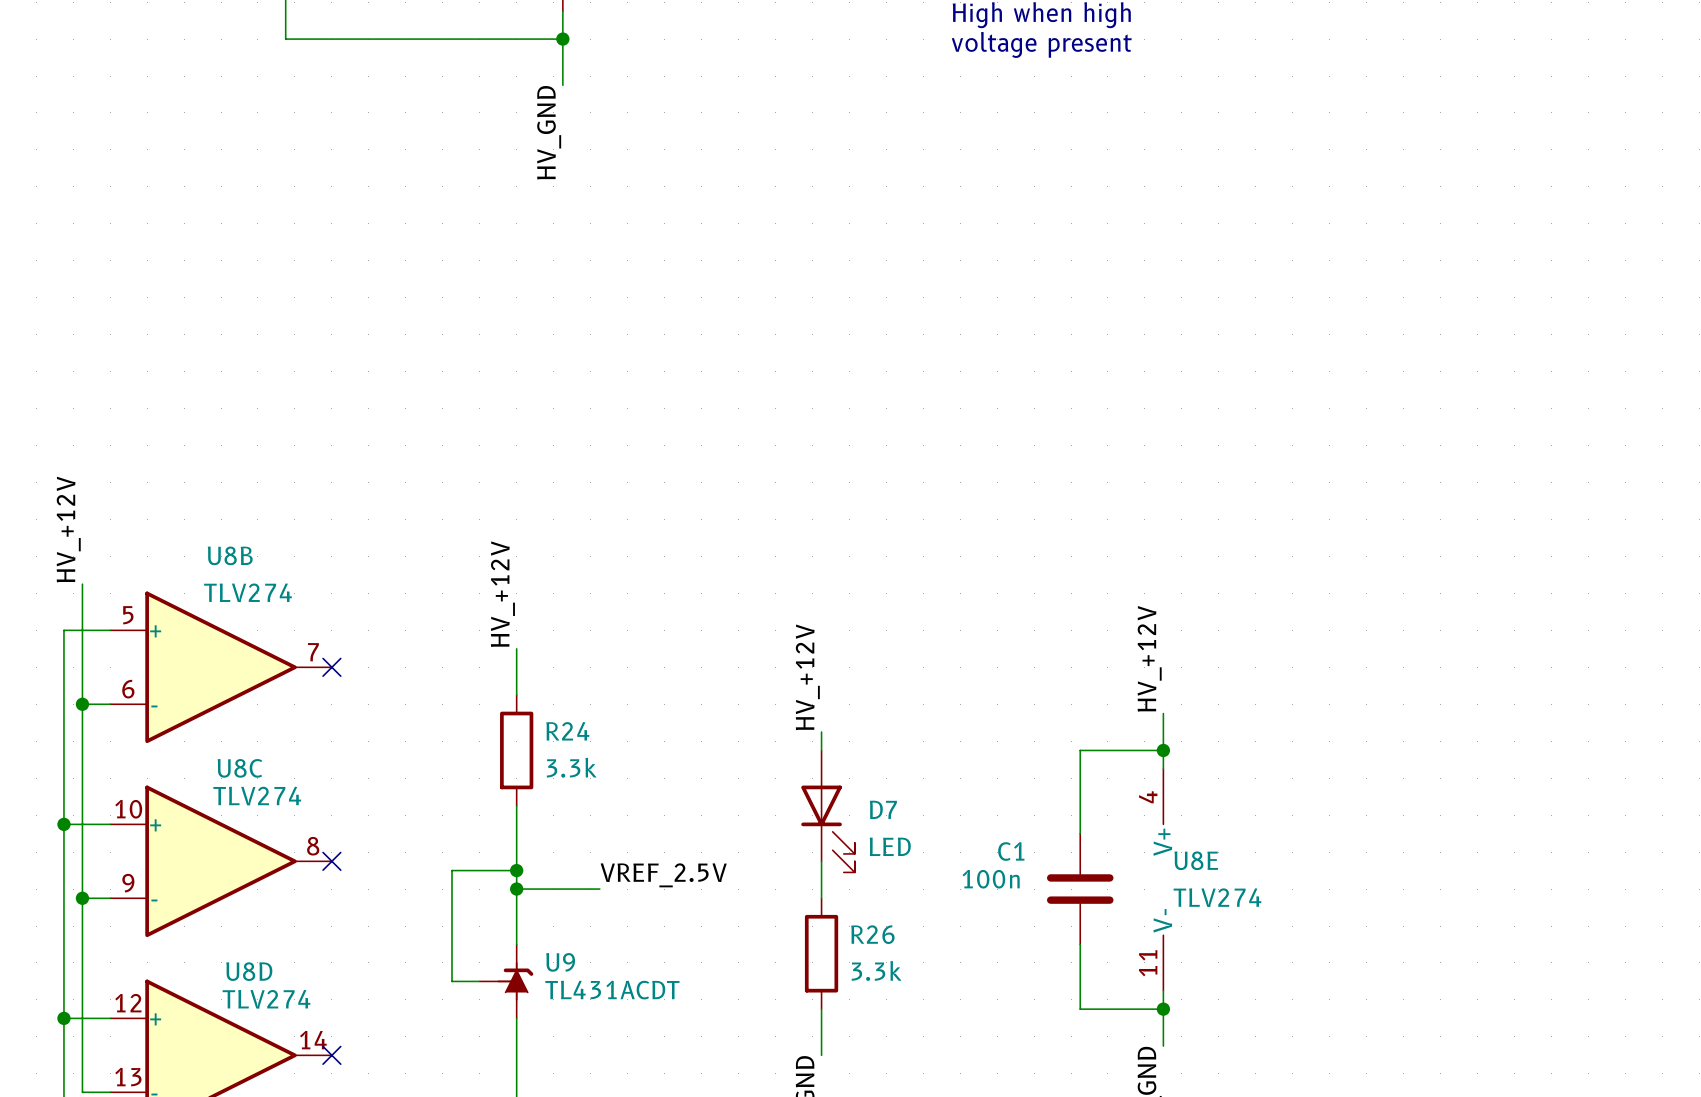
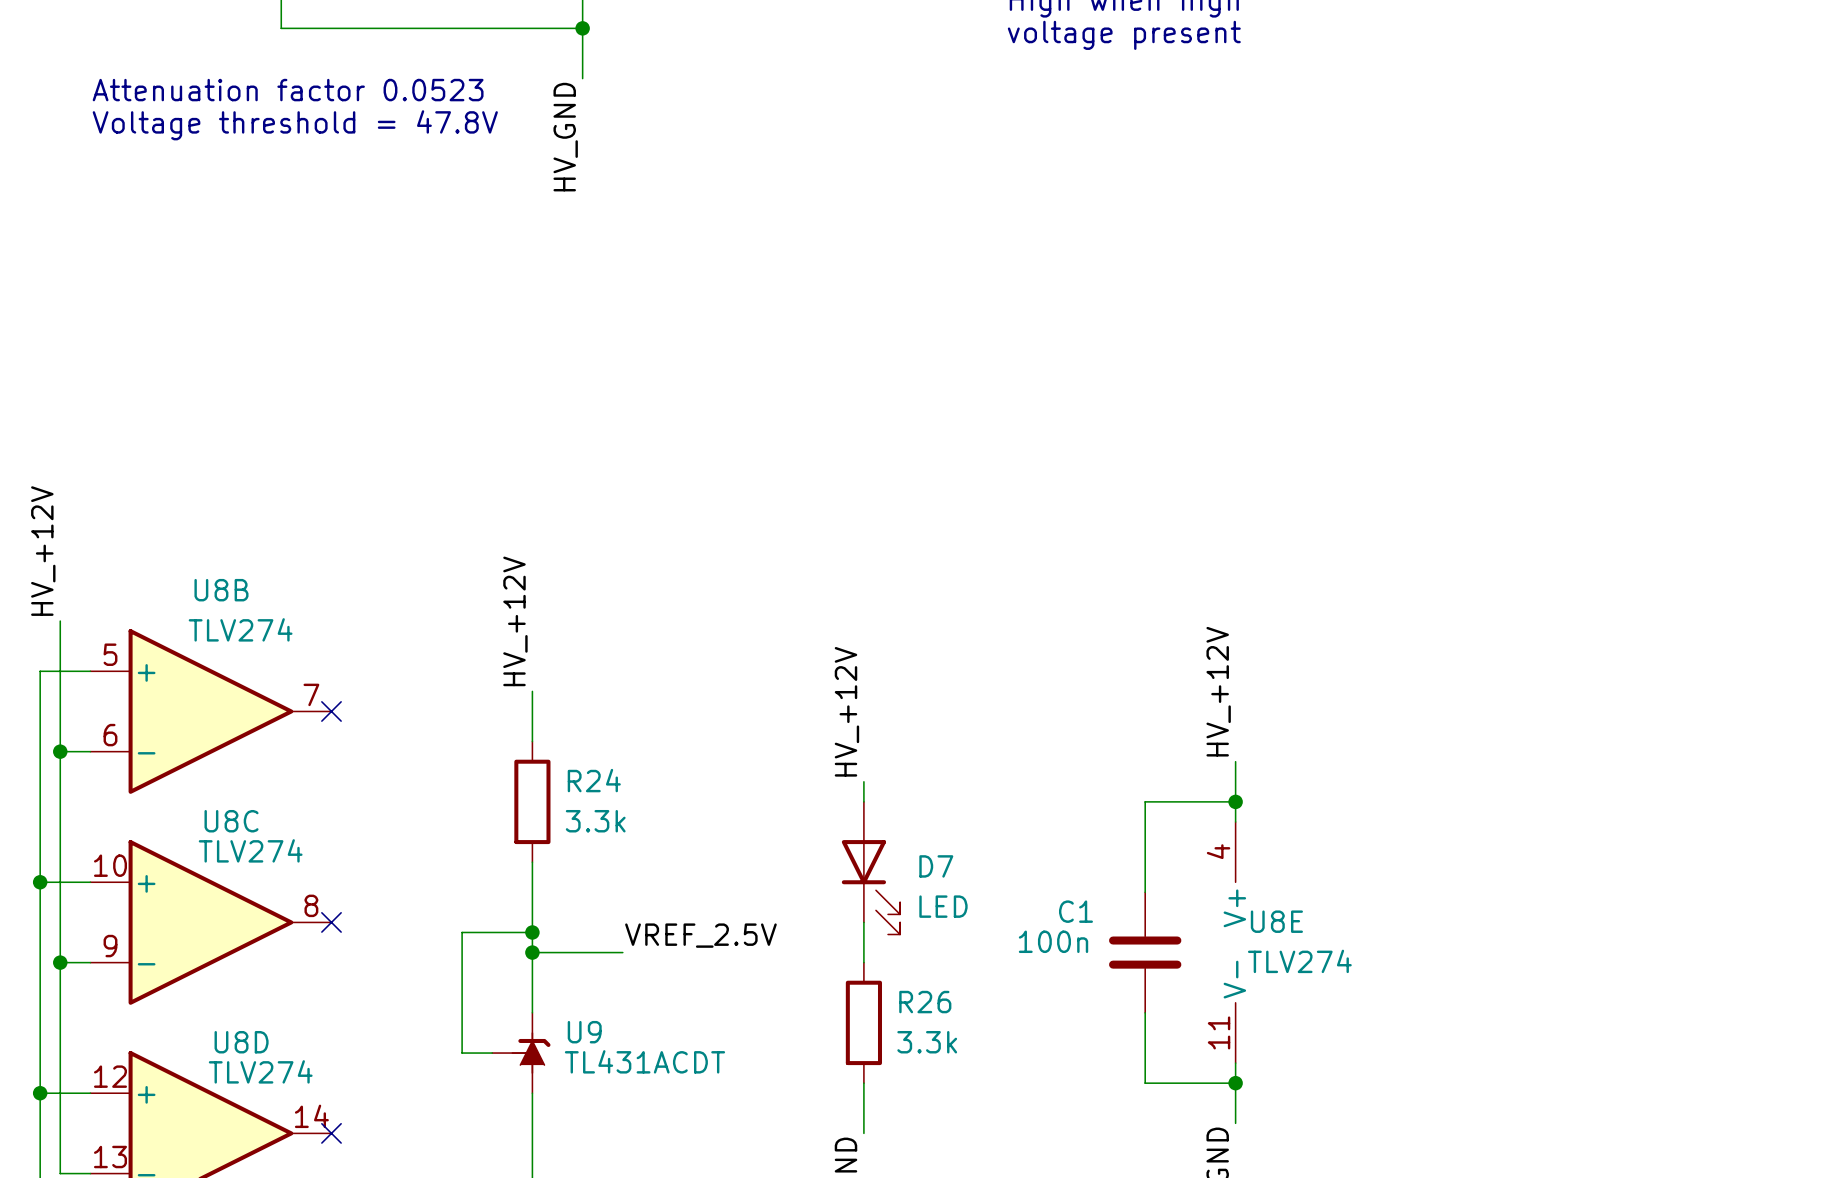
text: none -> Attenuation factor 0.0523 (288, 90)
text: none -> Voltage threshold = 47.8V (295, 125)

